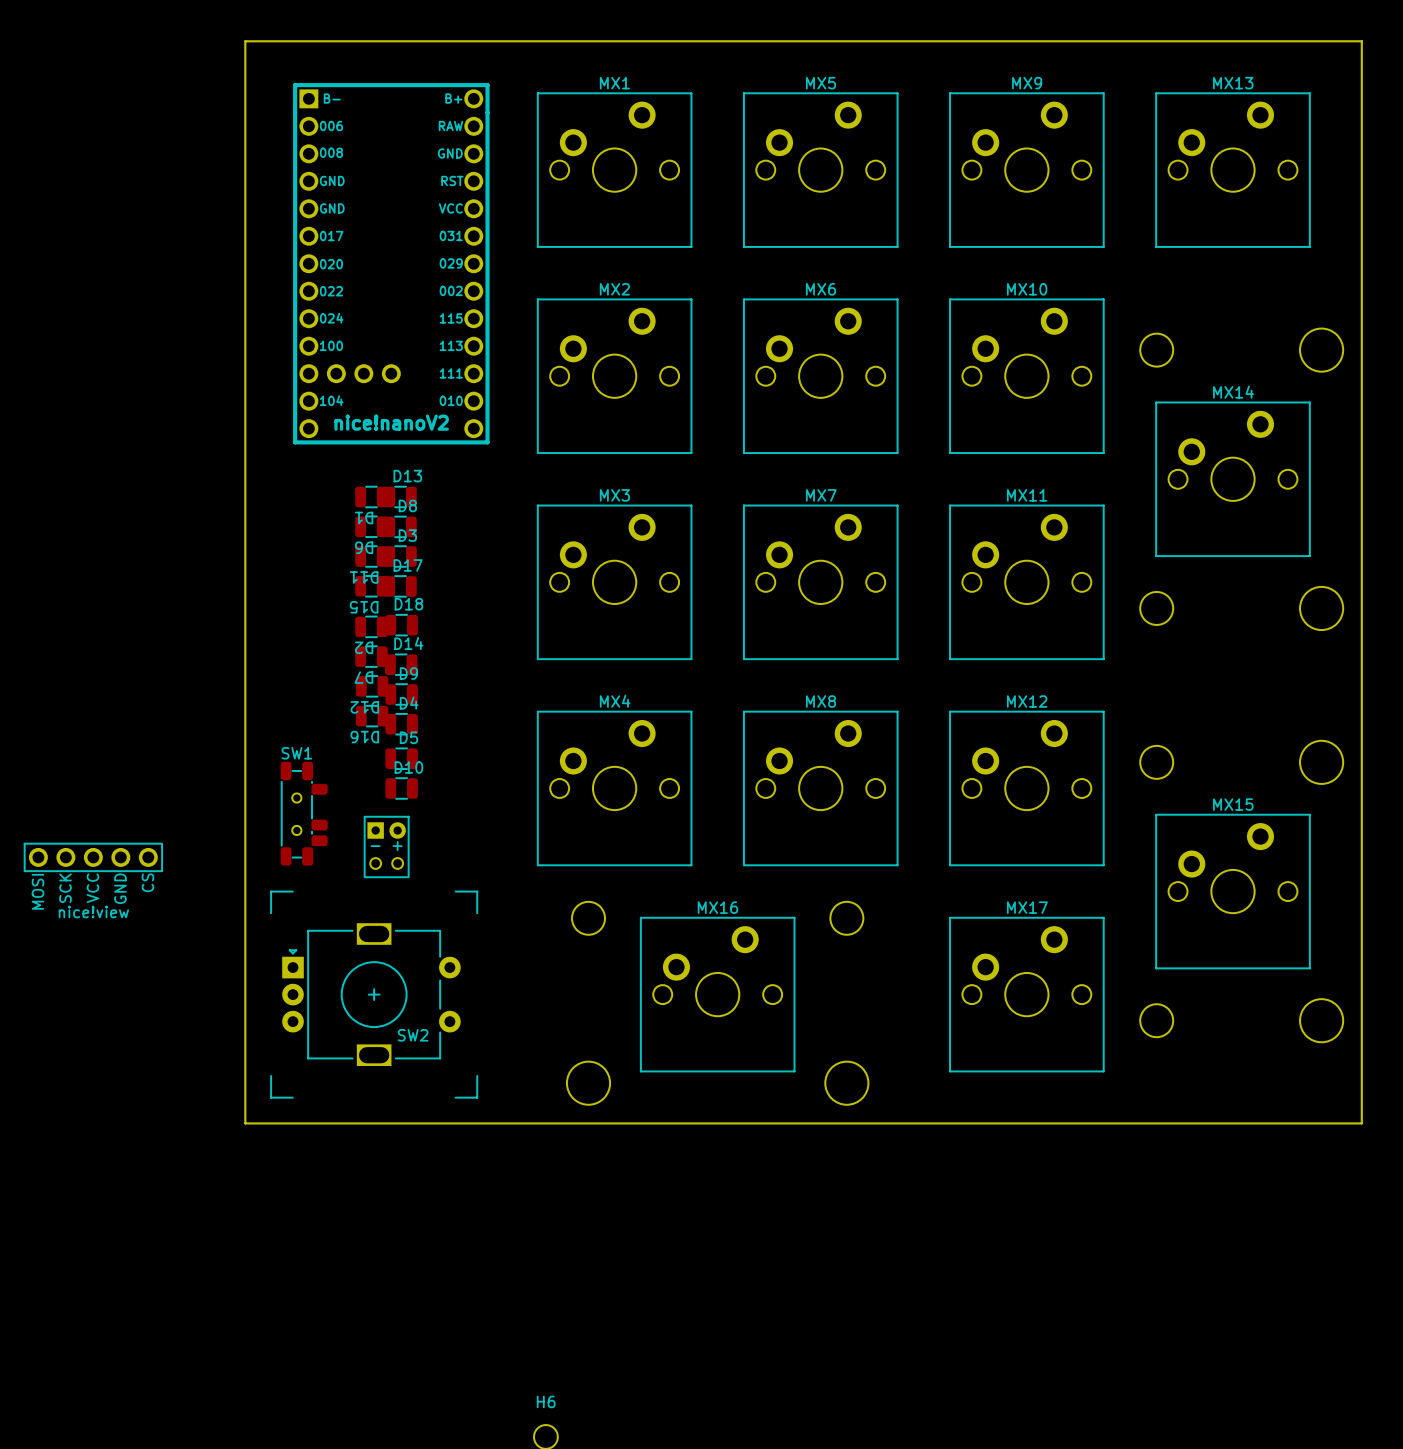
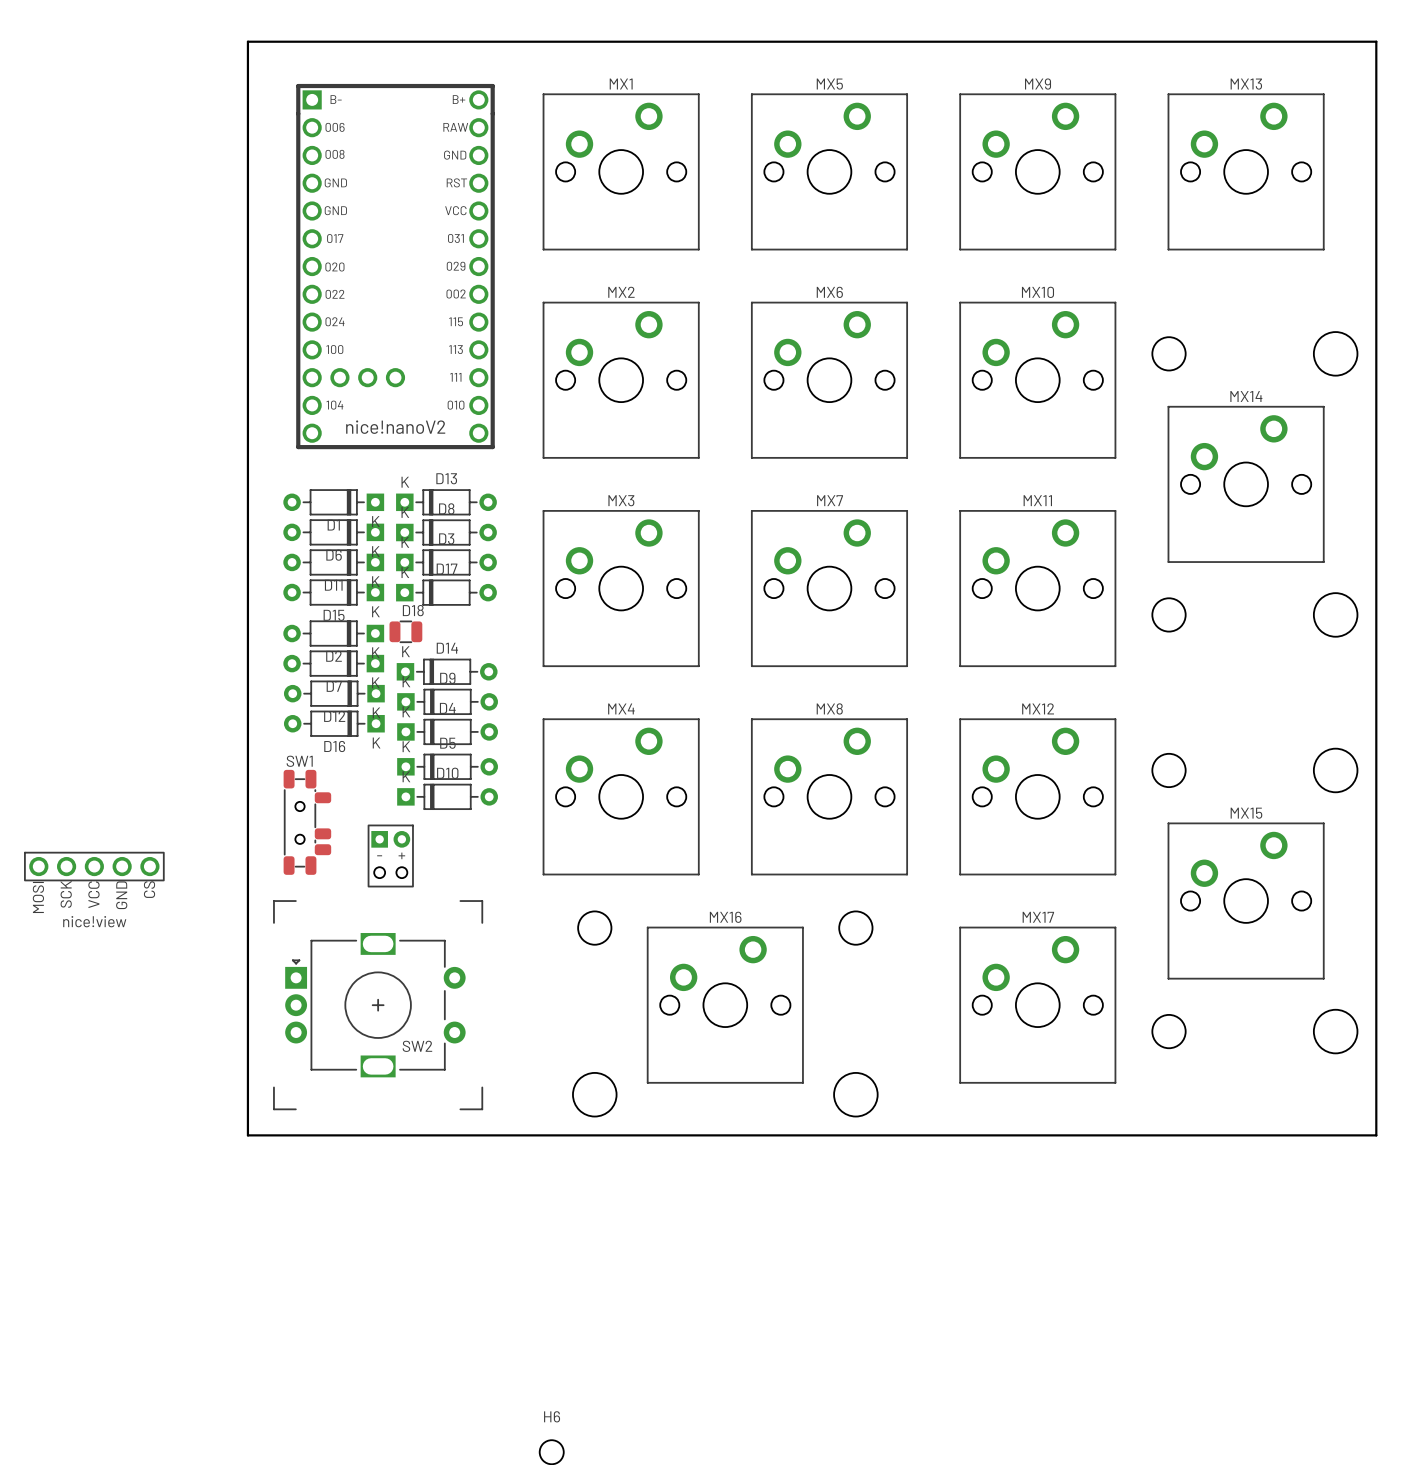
D1 footprint: [355, 486, 388, 508] -> [283, 489, 385, 516]
D13 footprint: [384, 486, 417, 508] -> [396, 489, 497, 516]
D6 footprint: [355, 515, 388, 538] -> [283, 519, 385, 546]
D8 footprint: [384, 515, 417, 538] -> [396, 519, 497, 546]
D11 footprint: [355, 545, 388, 568] -> [283, 549, 385, 576]
D3 footprint: [384, 545, 417, 568] -> [396, 549, 497, 576]
D15 footprint: [355, 575, 388, 598] -> [283, 579, 385, 606]
D17 footprint: [384, 575, 417, 598] -> [396, 579, 497, 606]
D2 footprint: [355, 615, 388, 638] -> [283, 620, 385, 647]
D7 footprint: [355, 645, 388, 668] -> [283, 650, 385, 677]
D14 footprint: [384, 653, 418, 676] -> [396, 658, 498, 685]
D12 footprint: [355, 675, 389, 698] -> [283, 680, 385, 707]
D9 footprint: [385, 683, 418, 706] -> [397, 688, 498, 715]
D16 footprint: [355, 705, 389, 728] -> [283, 710, 385, 737]
D4 footprint: [385, 713, 418, 736] -> [397, 719, 498, 745]
D5 footprint: [385, 747, 418, 770] -> [397, 753, 498, 780]
D10 footprint: [385, 777, 418, 800] -> [397, 783, 498, 810]

